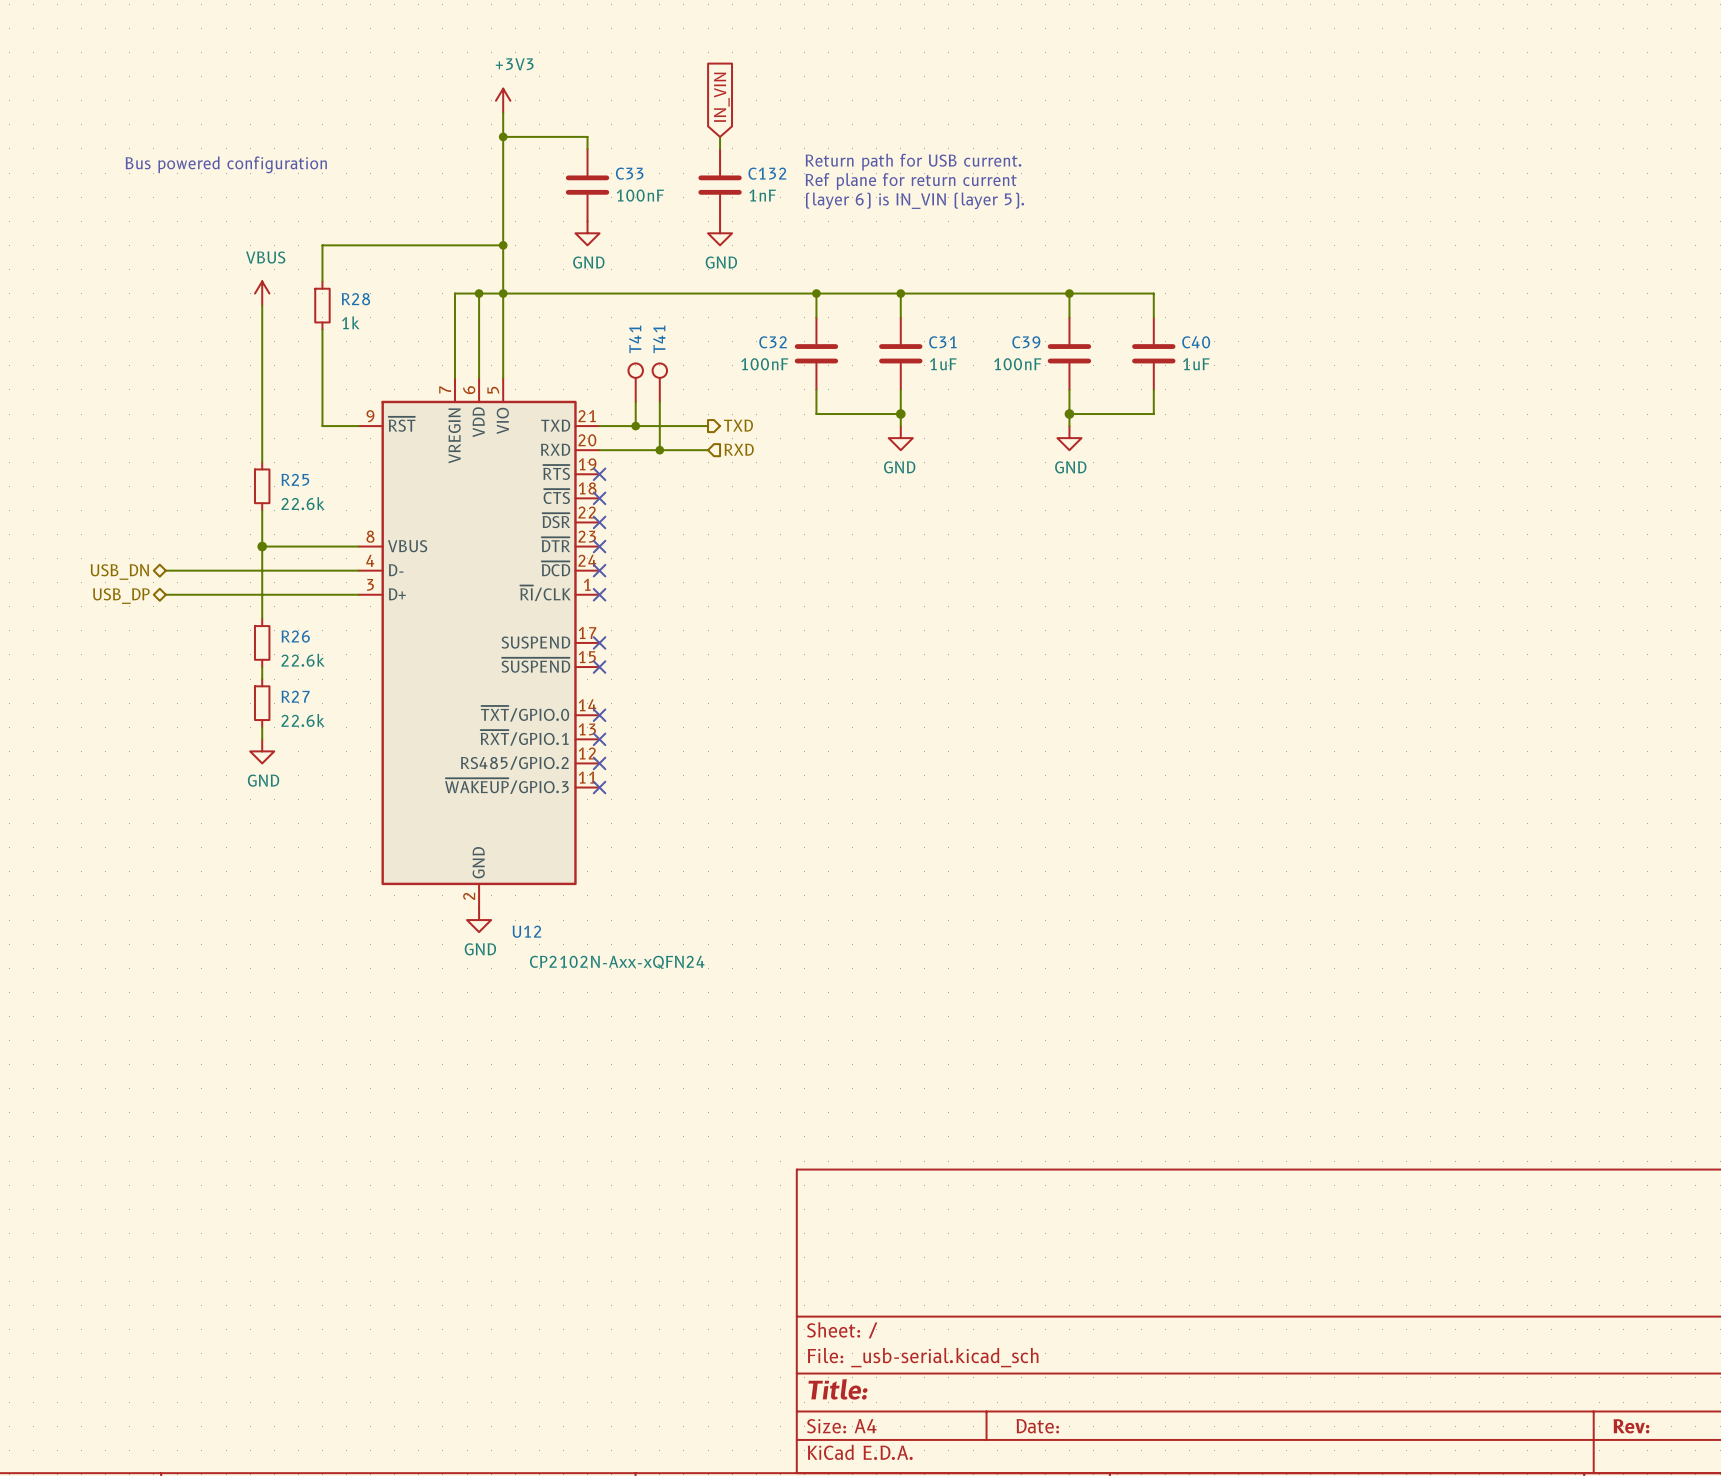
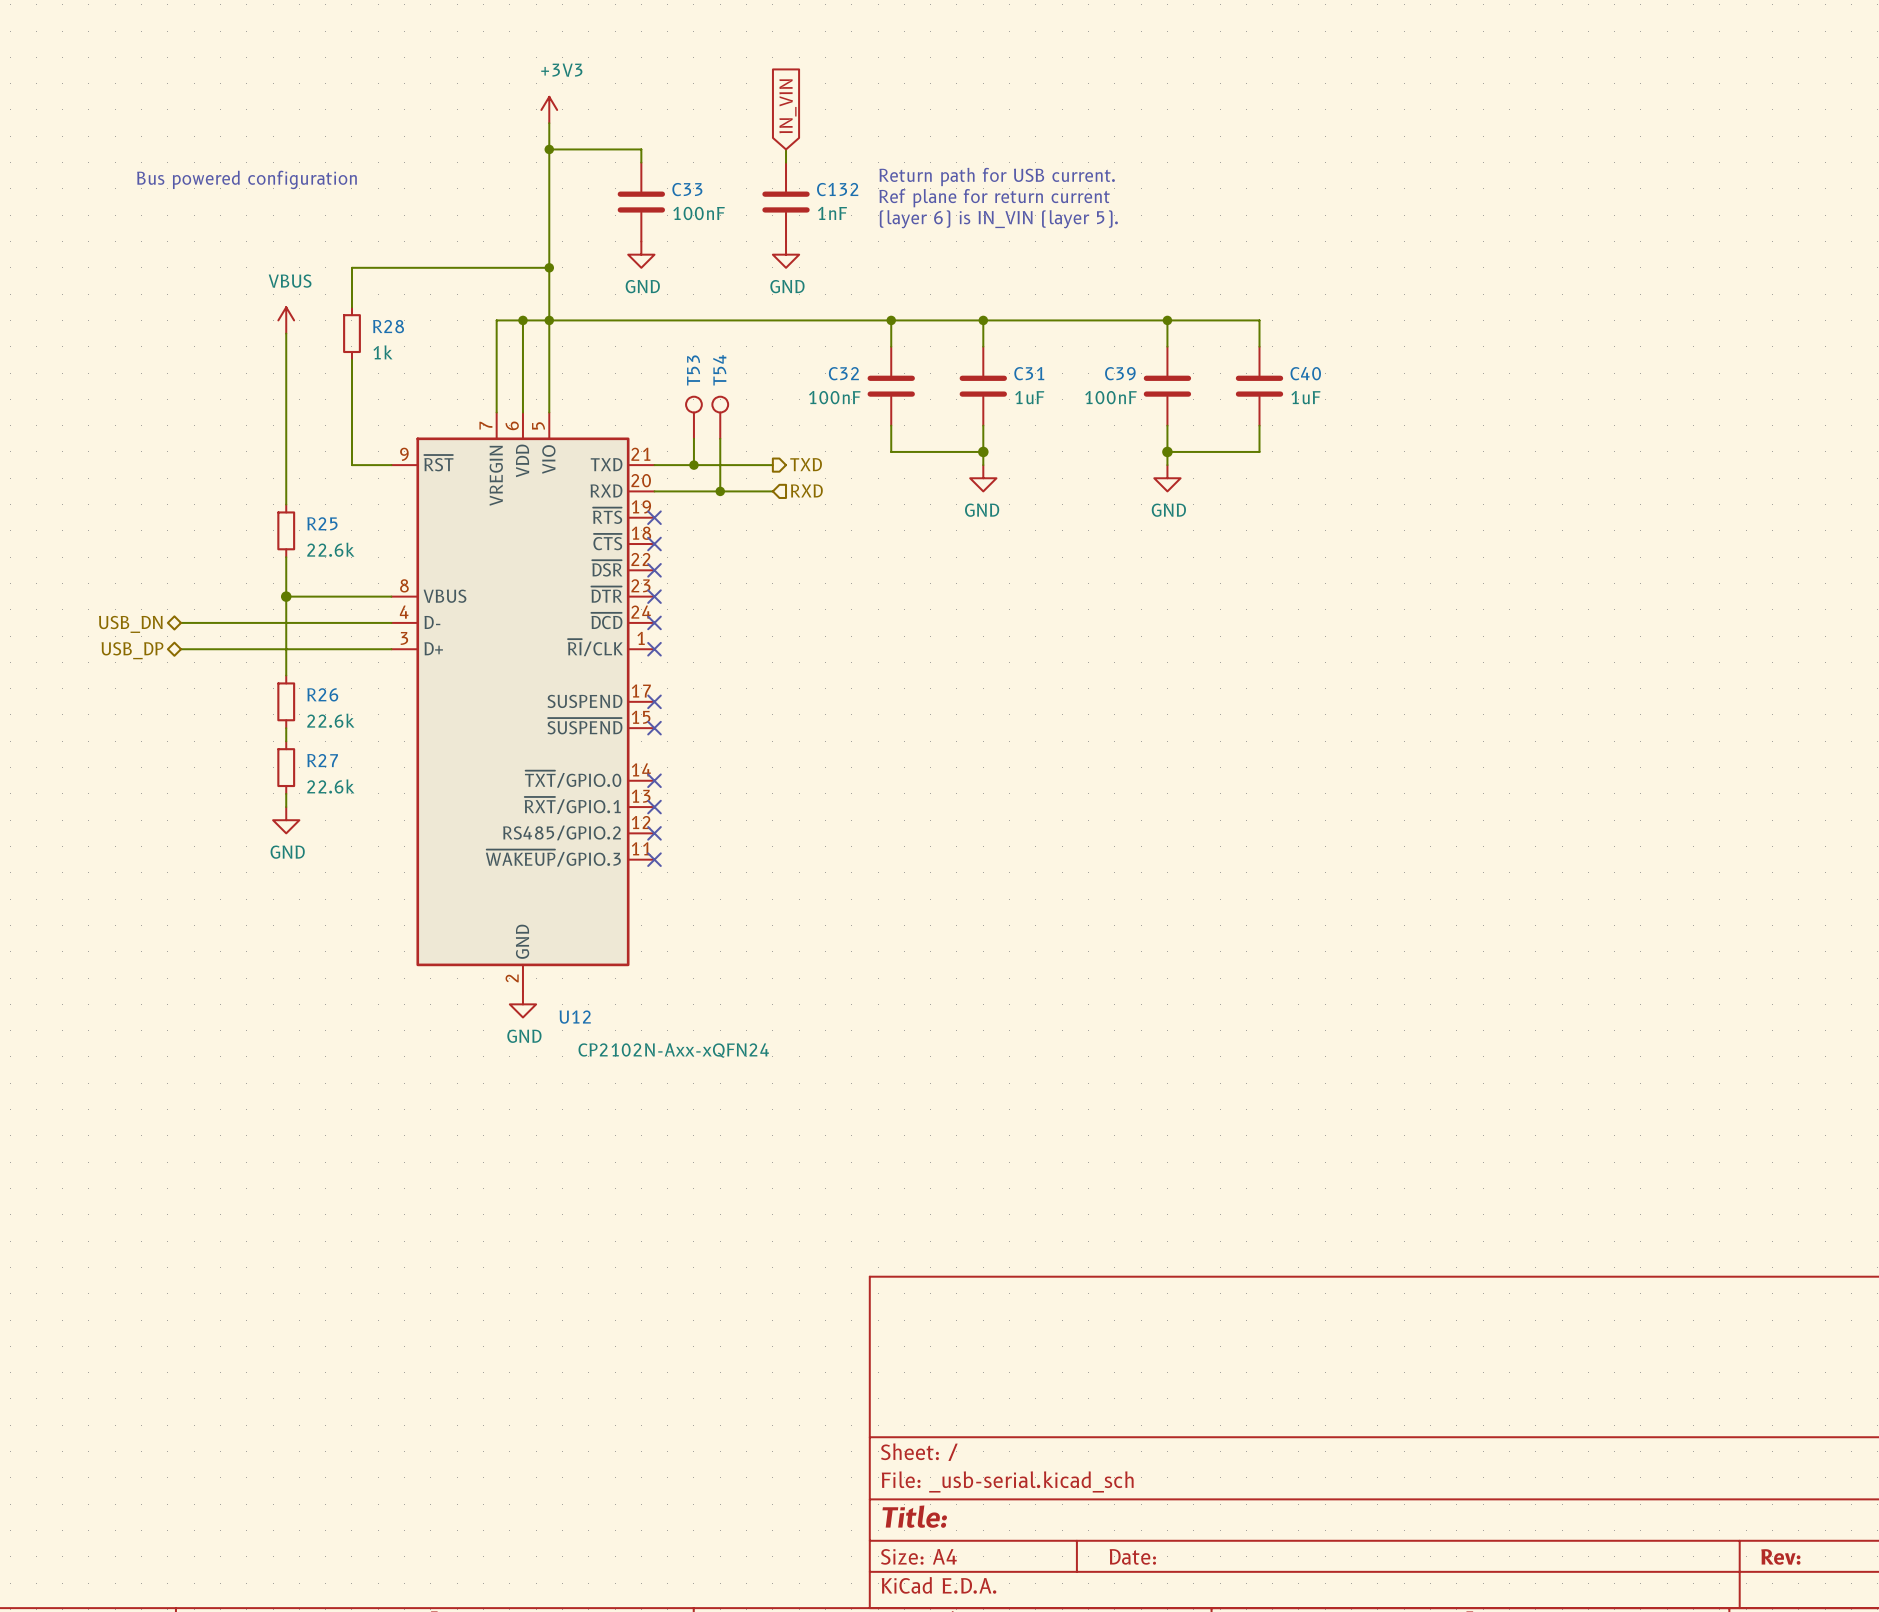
T41 name: T41 (635, 339) -> T53 (693, 370)
T41 name: T41 (659, 339) -> T54 (719, 370)

